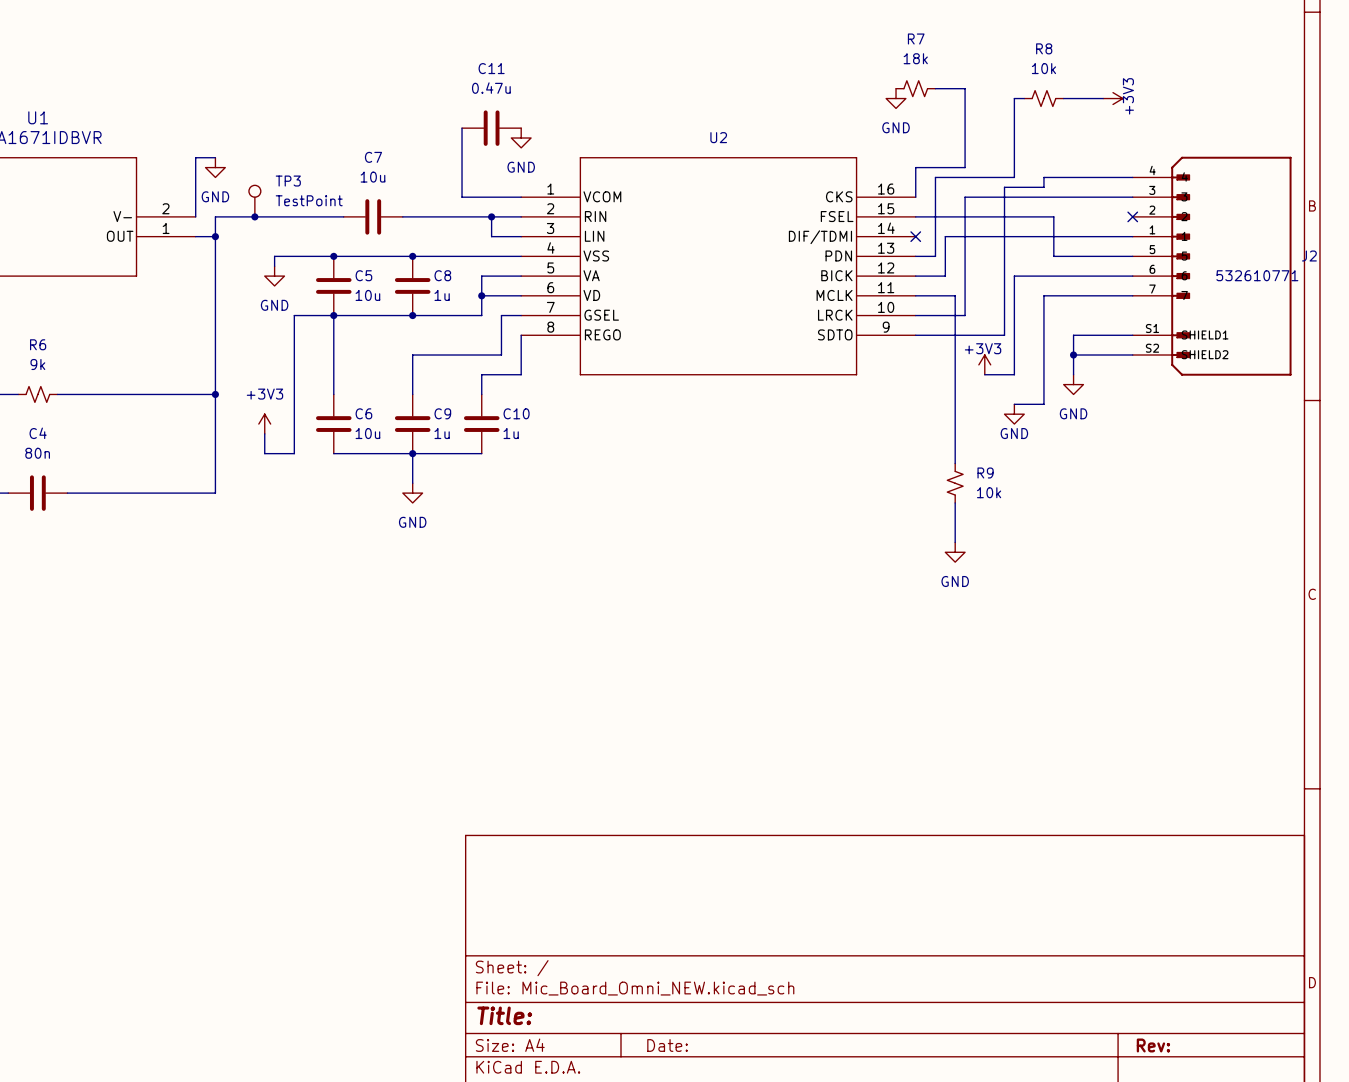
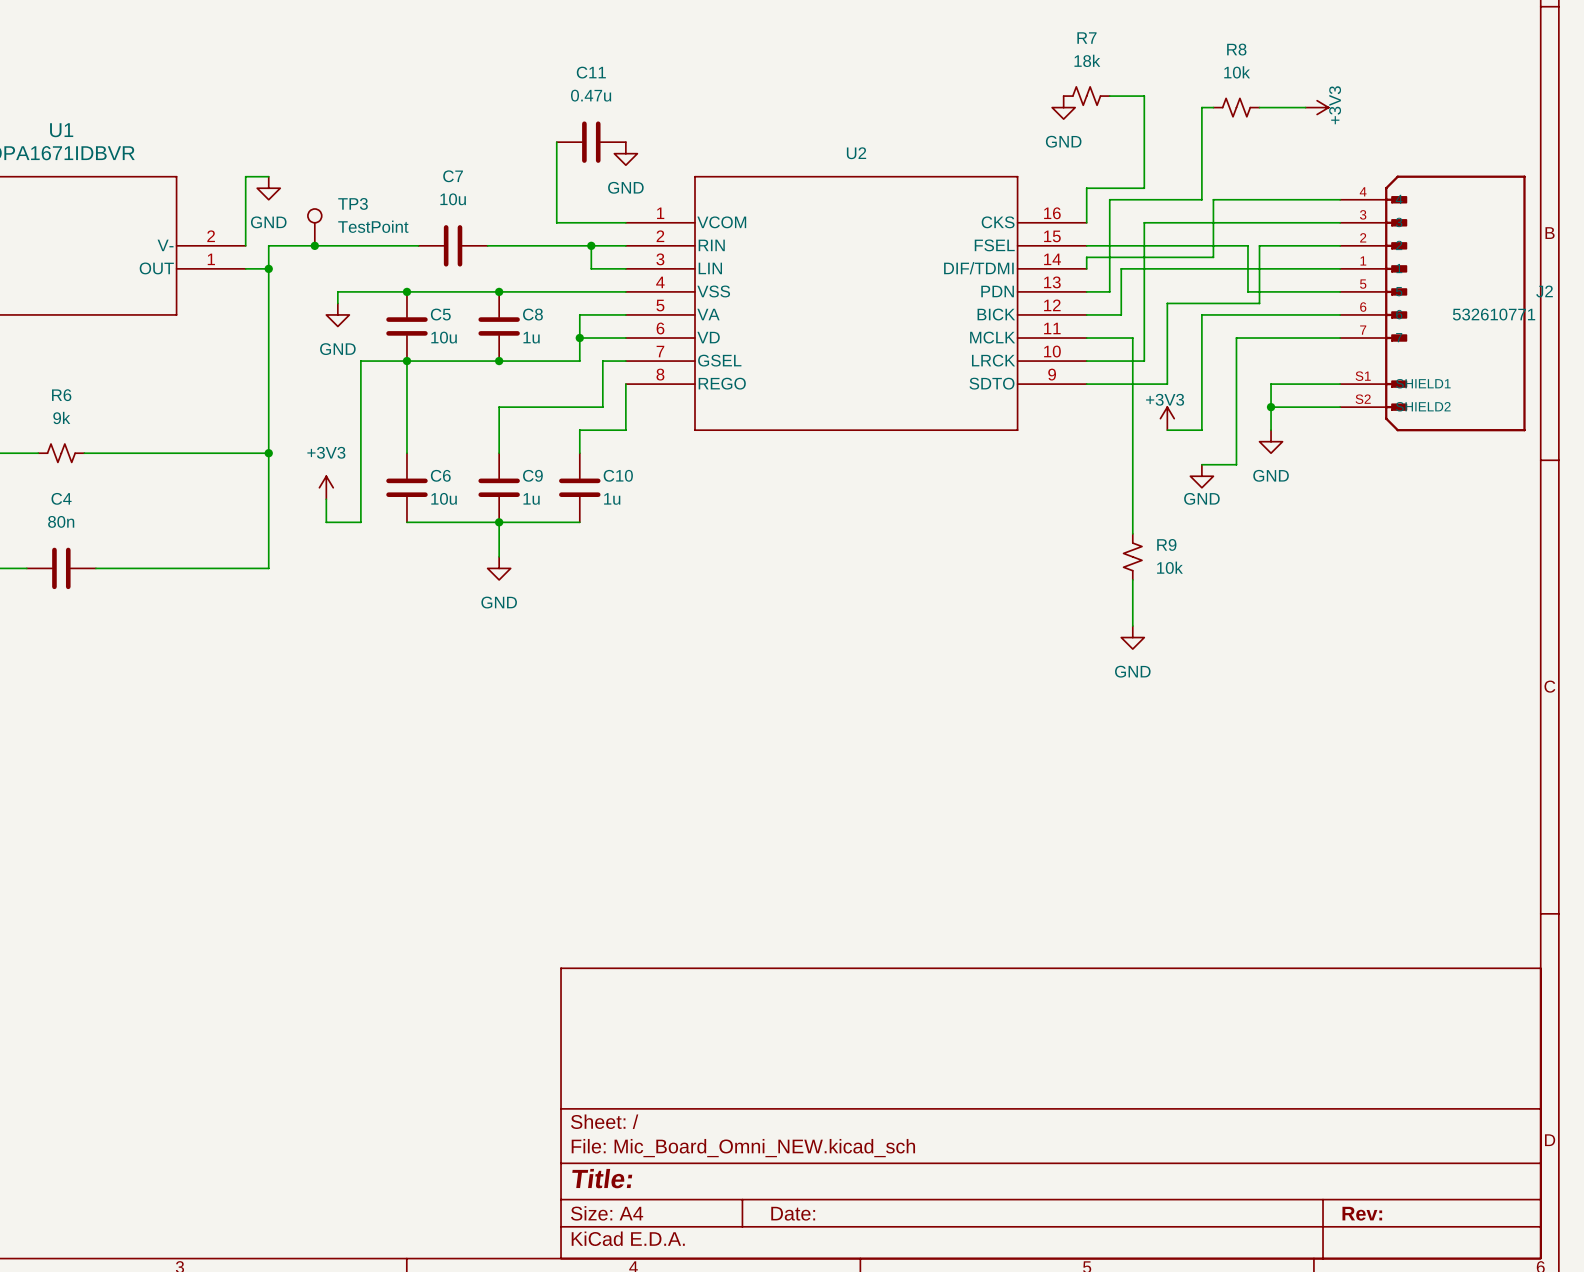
wire: (1043, 177) (1043, 187) (1004, 187) (1004, 335) (984, 335) -> (1340, 245) (1259, 245) (1259, 303) (1167, 303) (1167, 384)
wire: none -> (1236, 199) (1213, 199) (1213, 257) (1086, 257) (1086, 268)
no-connect mark: (1132, 216) -> none
no-connect mark: (915, 236) -> none

